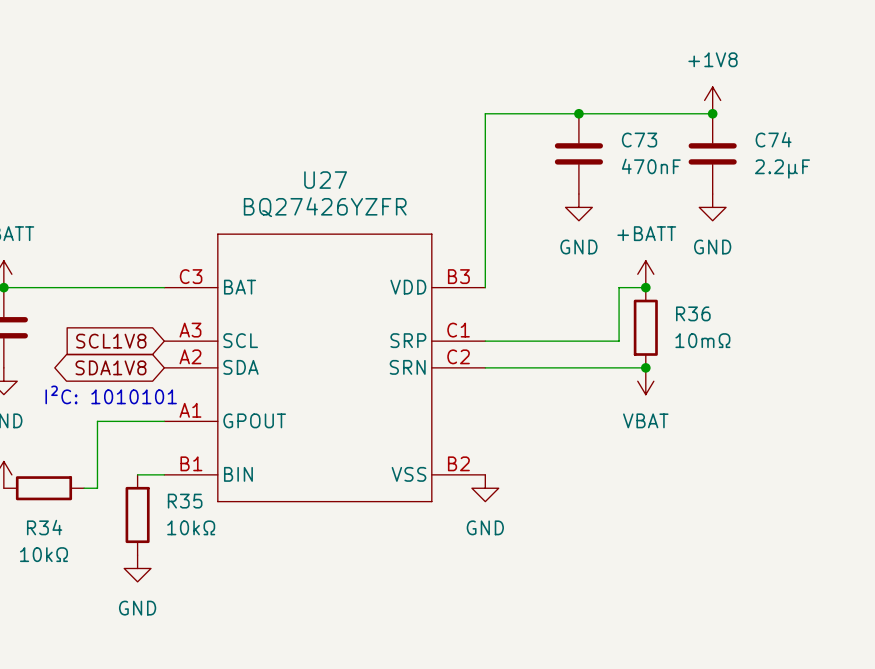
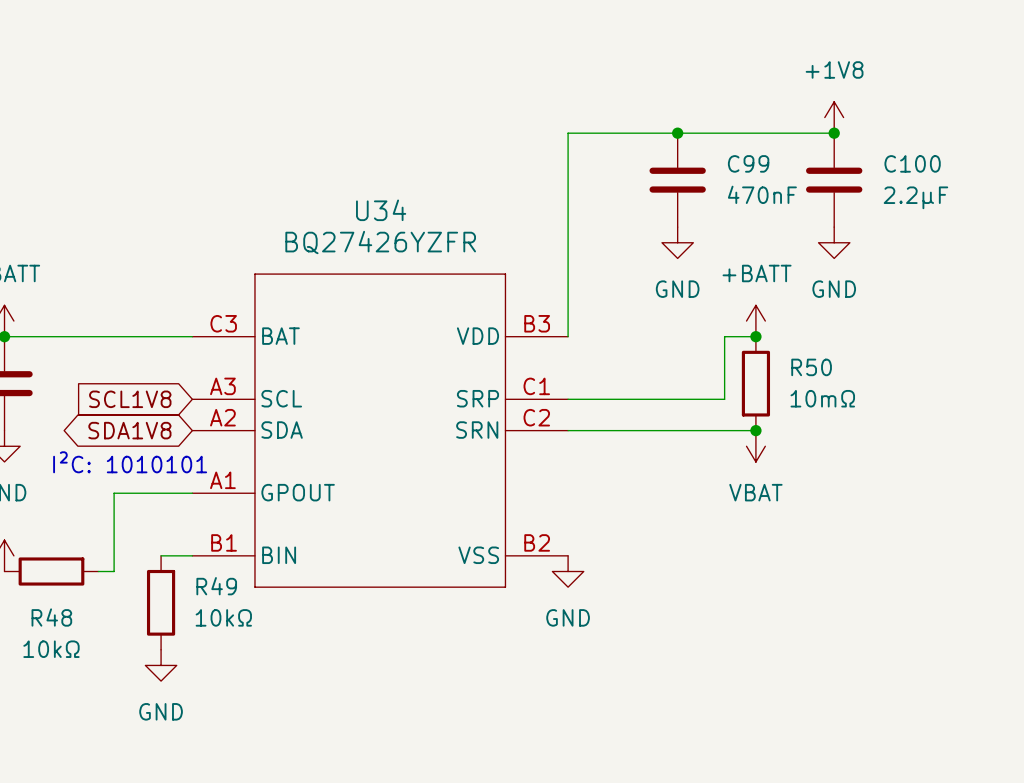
C74 name: C74 (773, 139) -> C100 (912, 163)
C73 name: C73 (639, 140) -> C99 (748, 163)
U27 name: U27 (325, 180) -> U34 (381, 210)
R36 name: R36 (693, 313) -> R50 (811, 367)
R35 name: R35 (185, 501) -> R49 (216, 586)
R34 name: R34 (44, 527) -> R48 (51, 617)

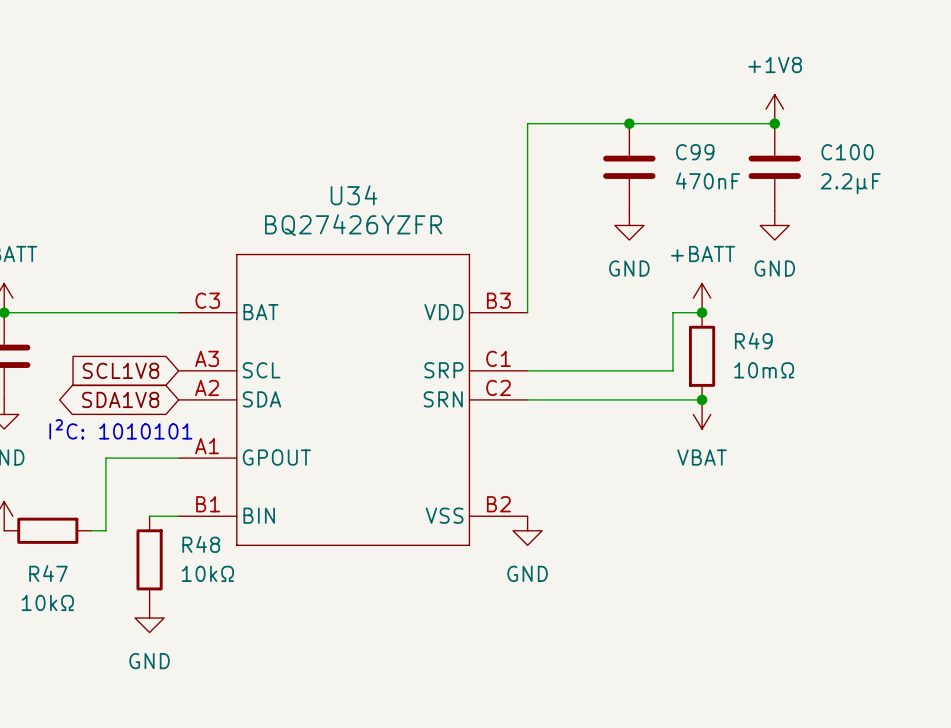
R50 name: R50 (811, 367) -> R49 (753, 340)
R49 name: R49 (216, 586) -> R48 (201, 544)
R48 name: R48 (51, 617) -> R47 (48, 573)

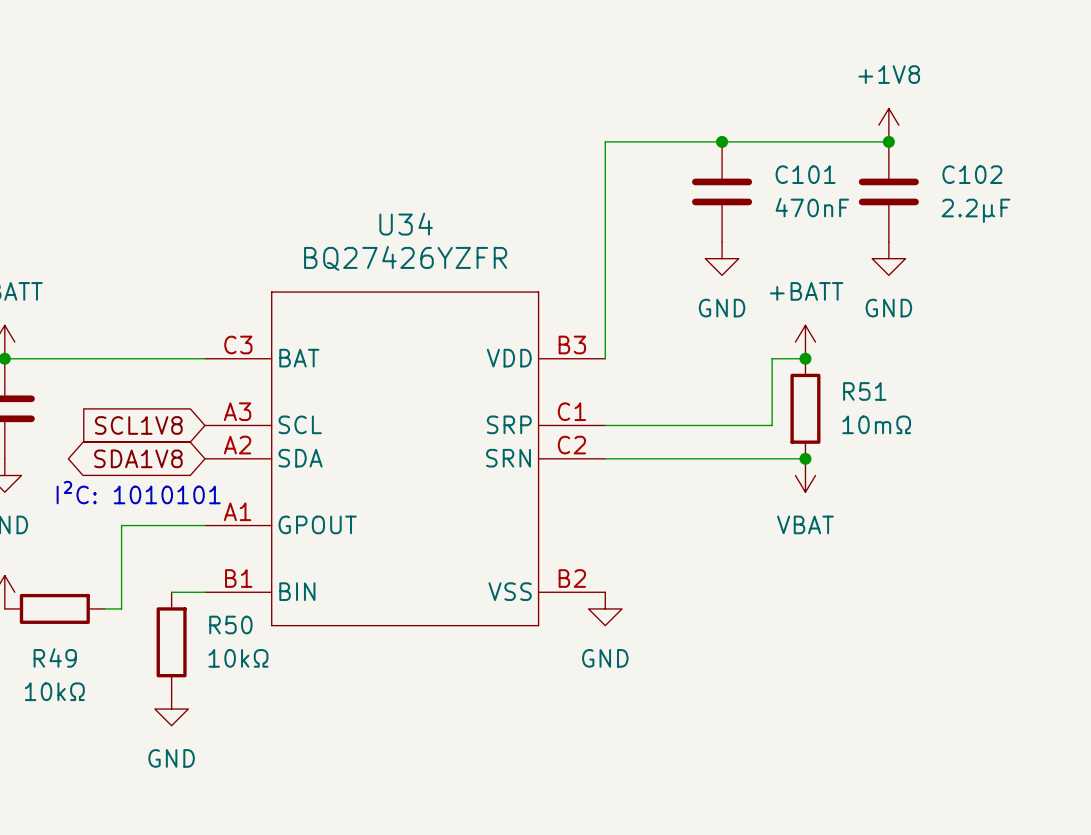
C99 name: C99 (695, 152) -> C101 (805, 174)
C100 name: C100 (847, 152) -> C102 (972, 174)
R49 name: R49 (753, 340) -> R51 (864, 391)
R48 name: R48 (201, 544) -> R50 (230, 625)
R47 name: R47 (48, 573) -> R49 (55, 657)

